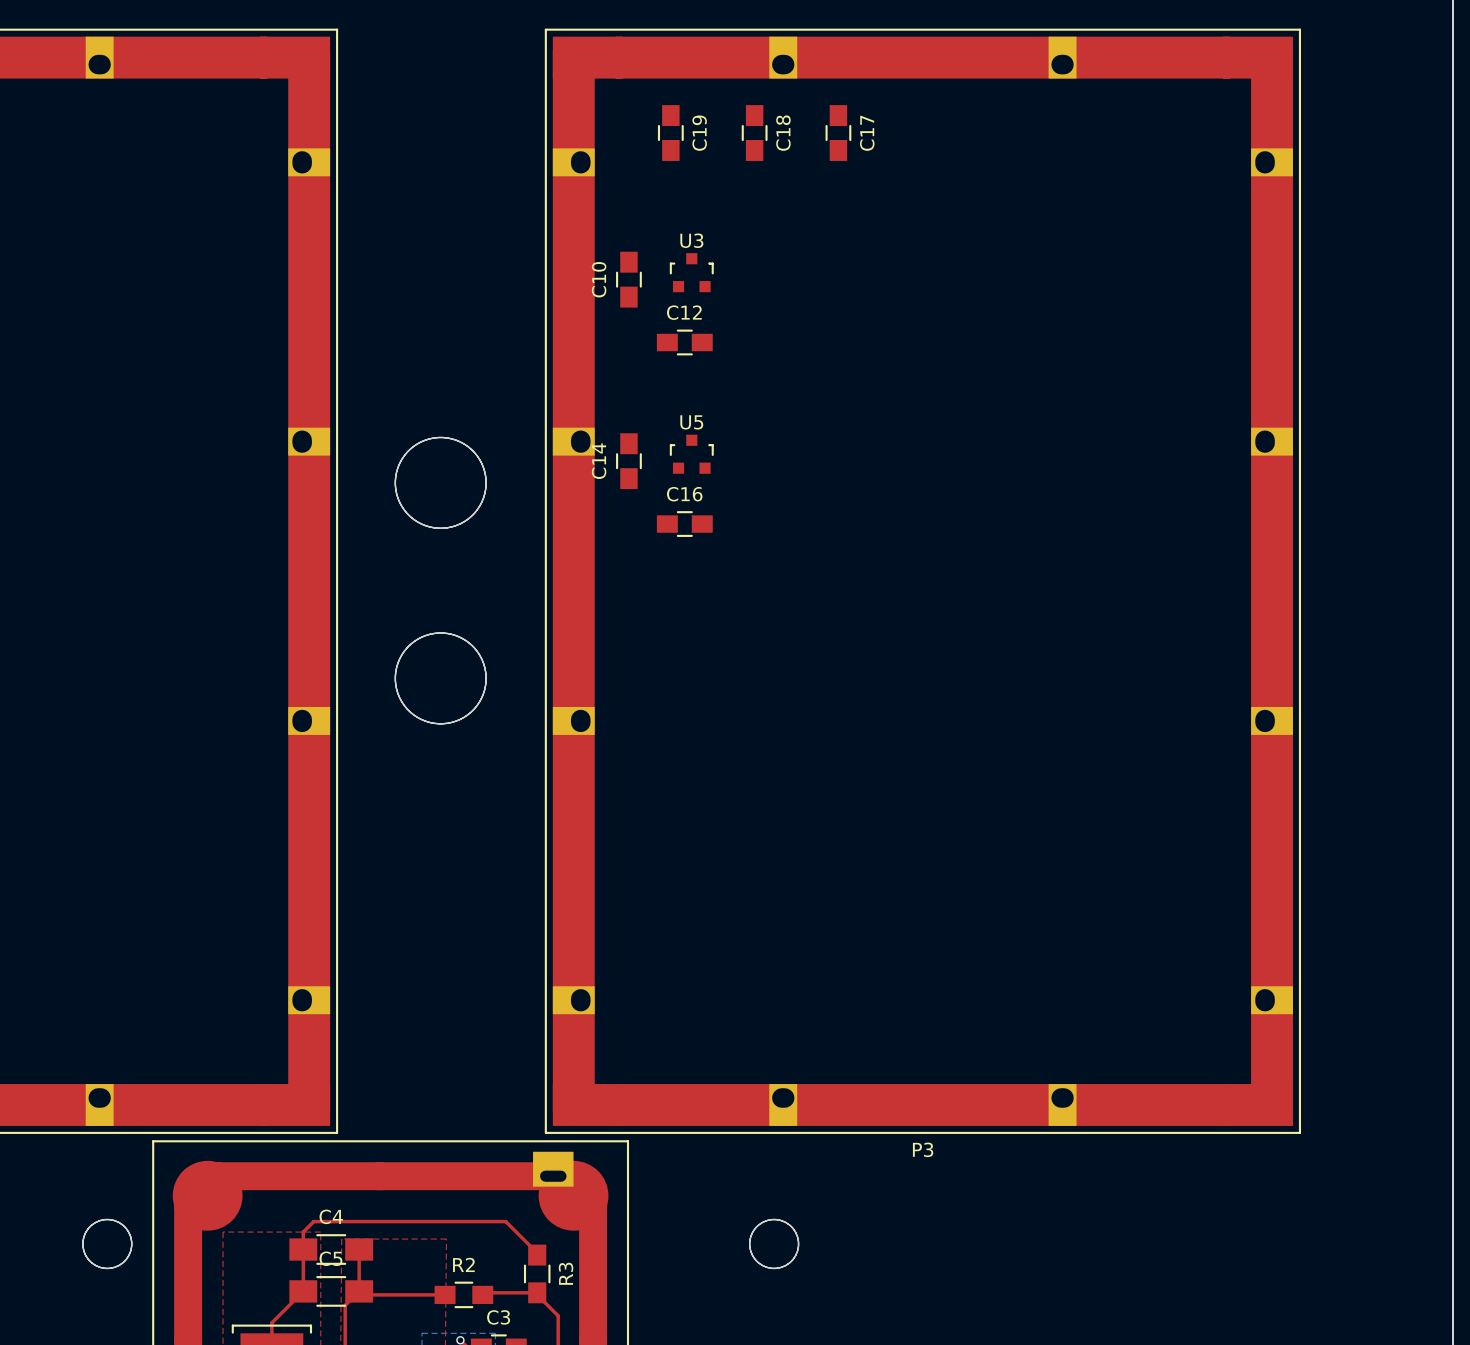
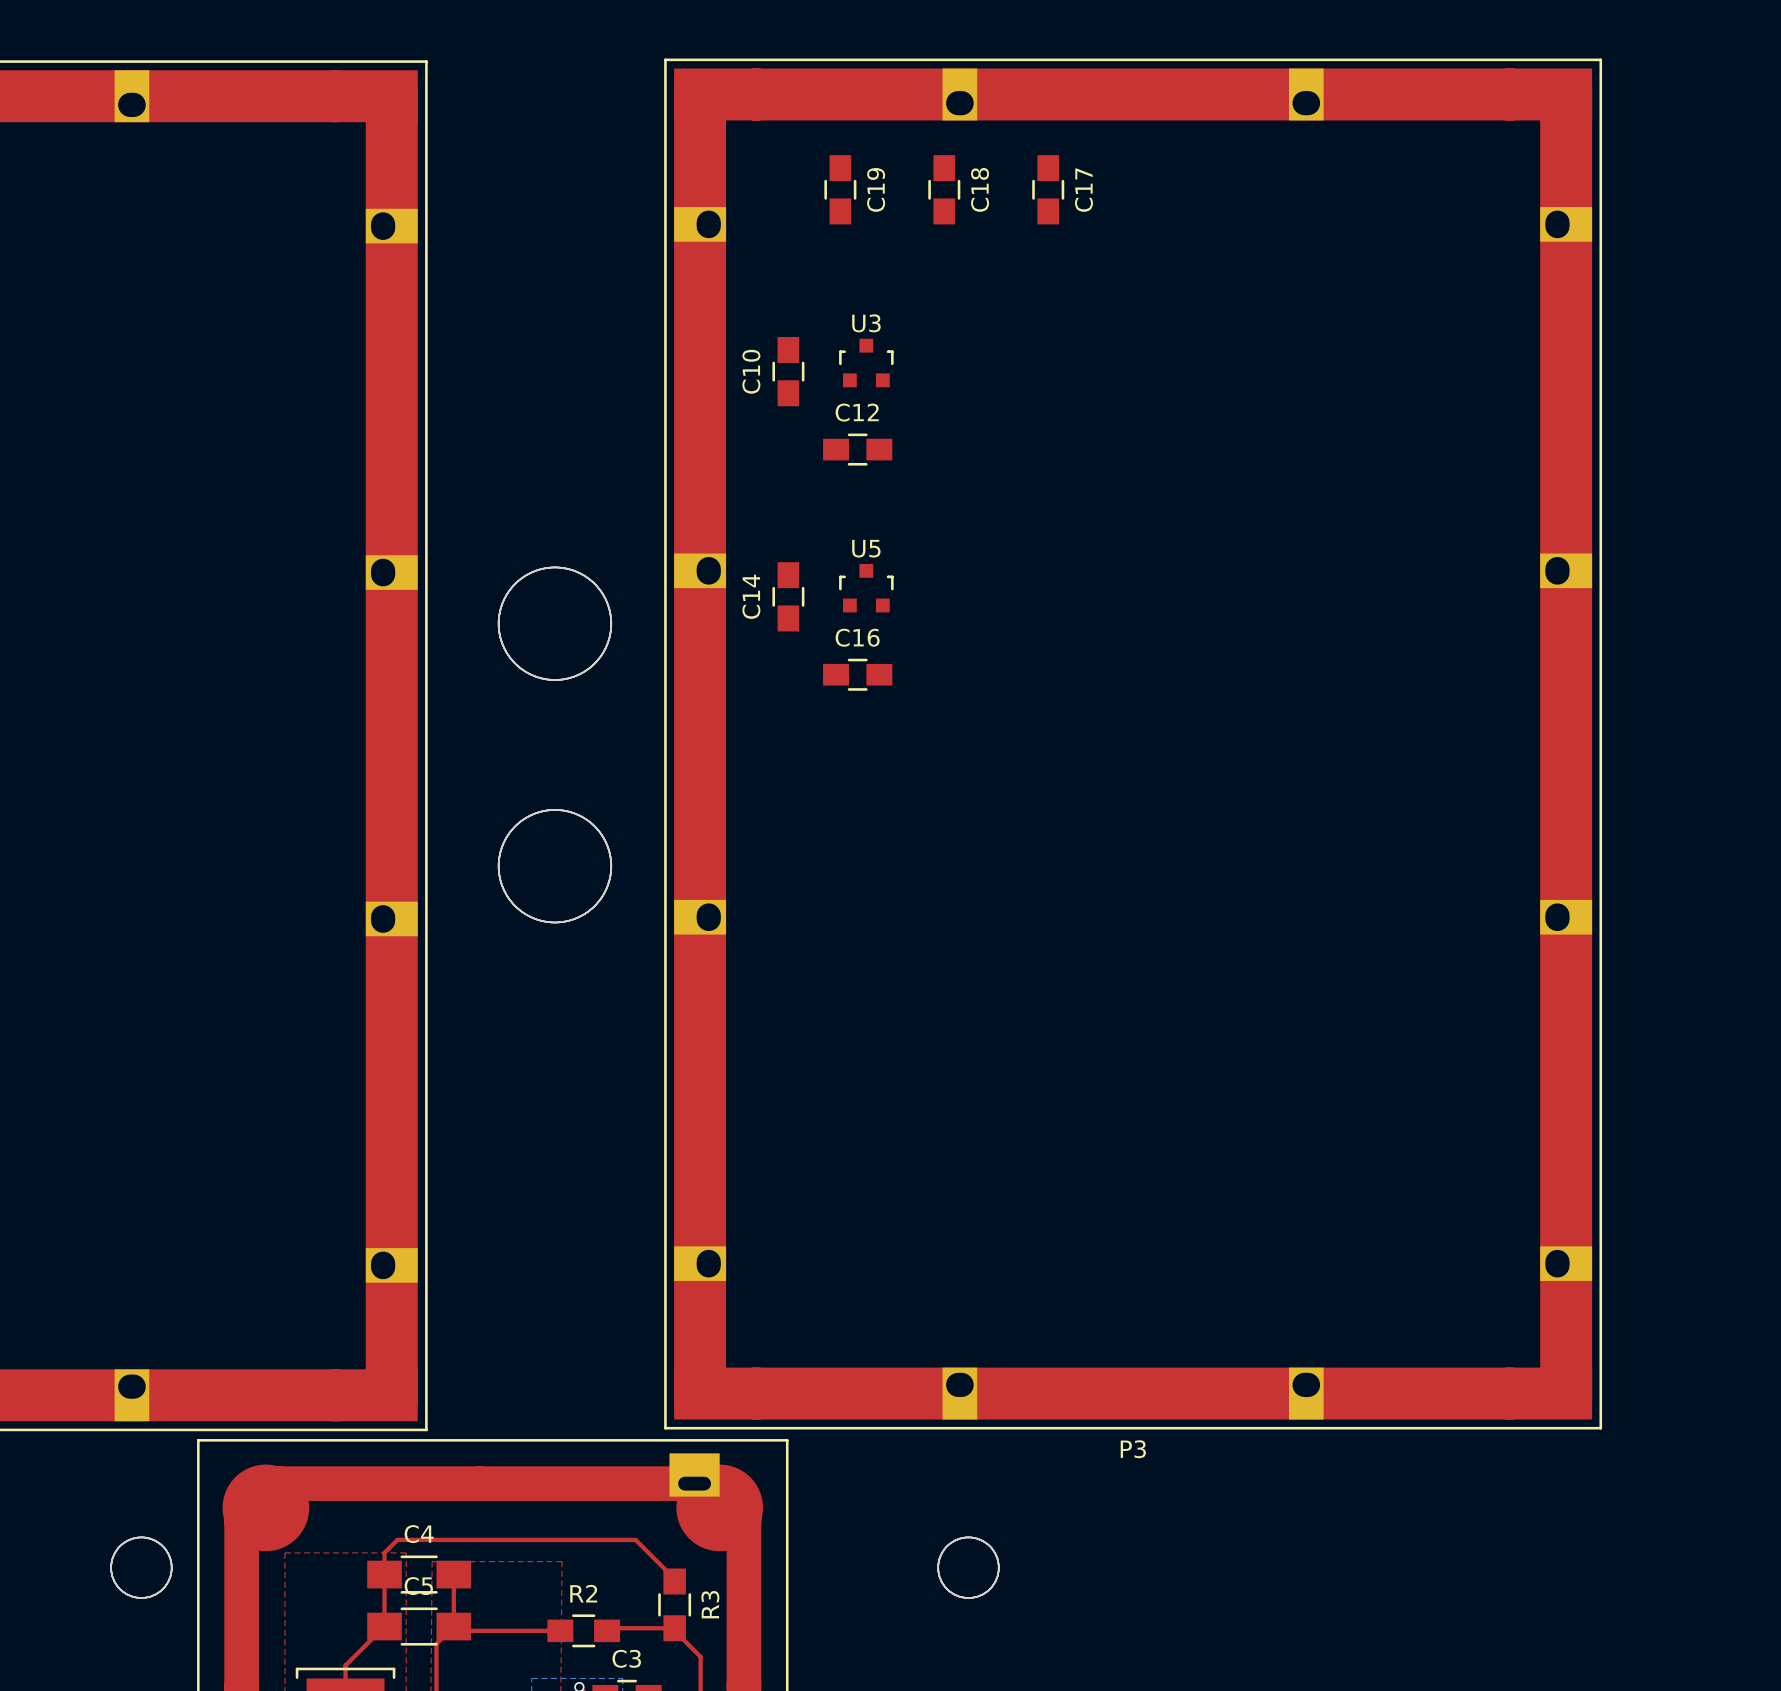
P3 position: (922, 581) -> (1133, 744)

